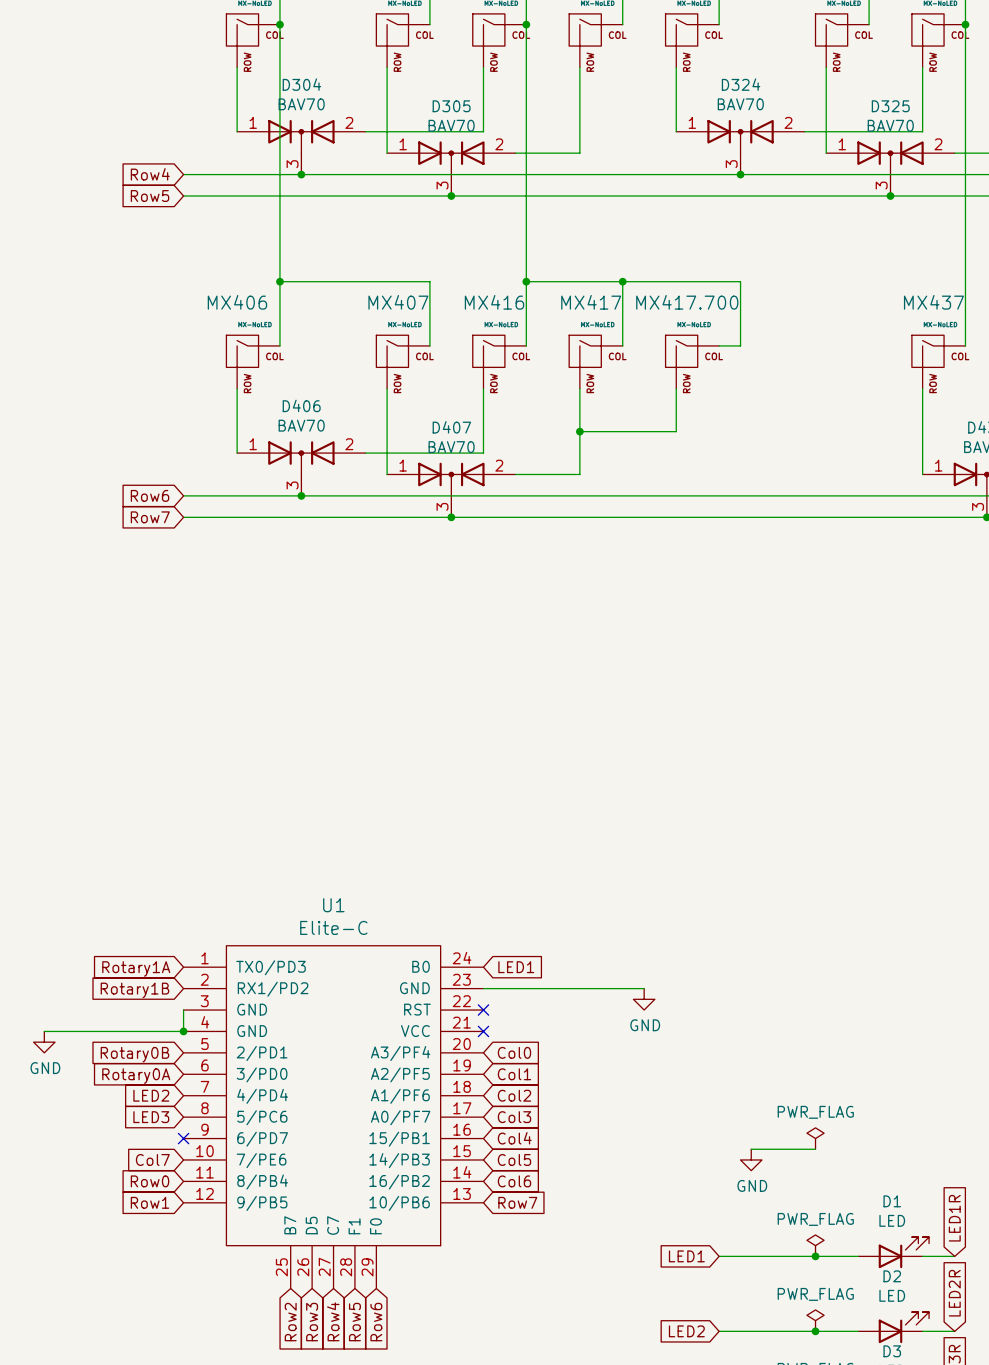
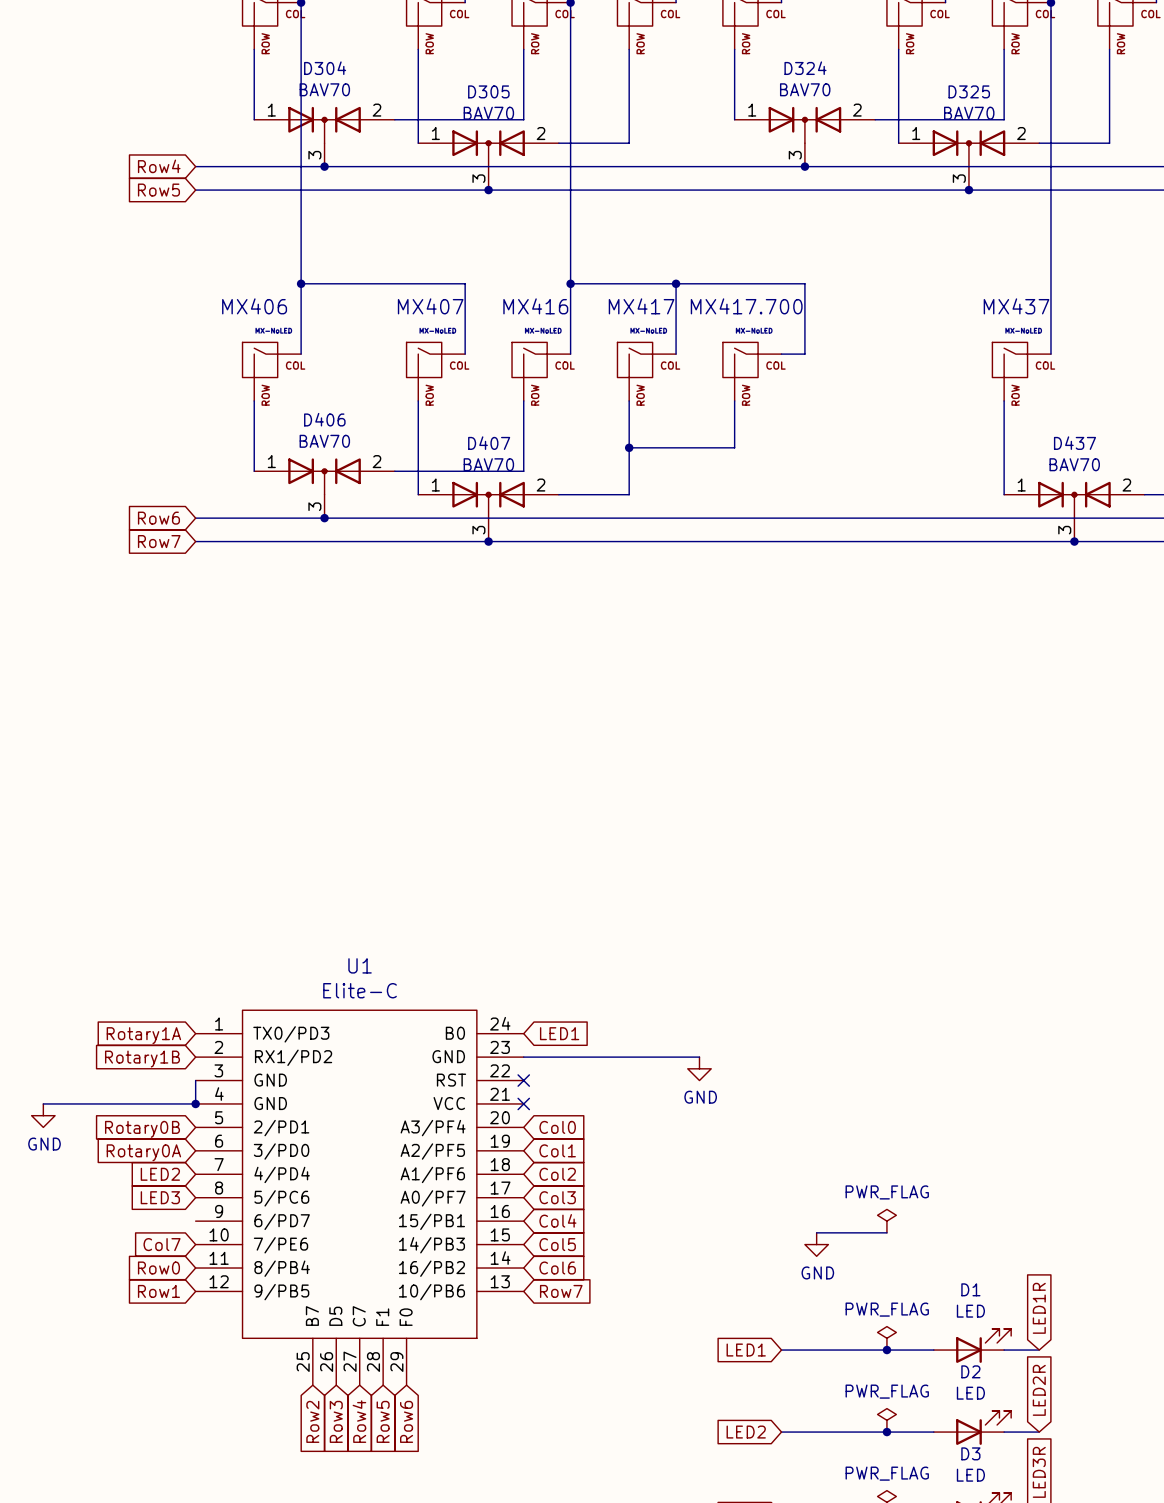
no-connect mark: (183, 1138) -> none

